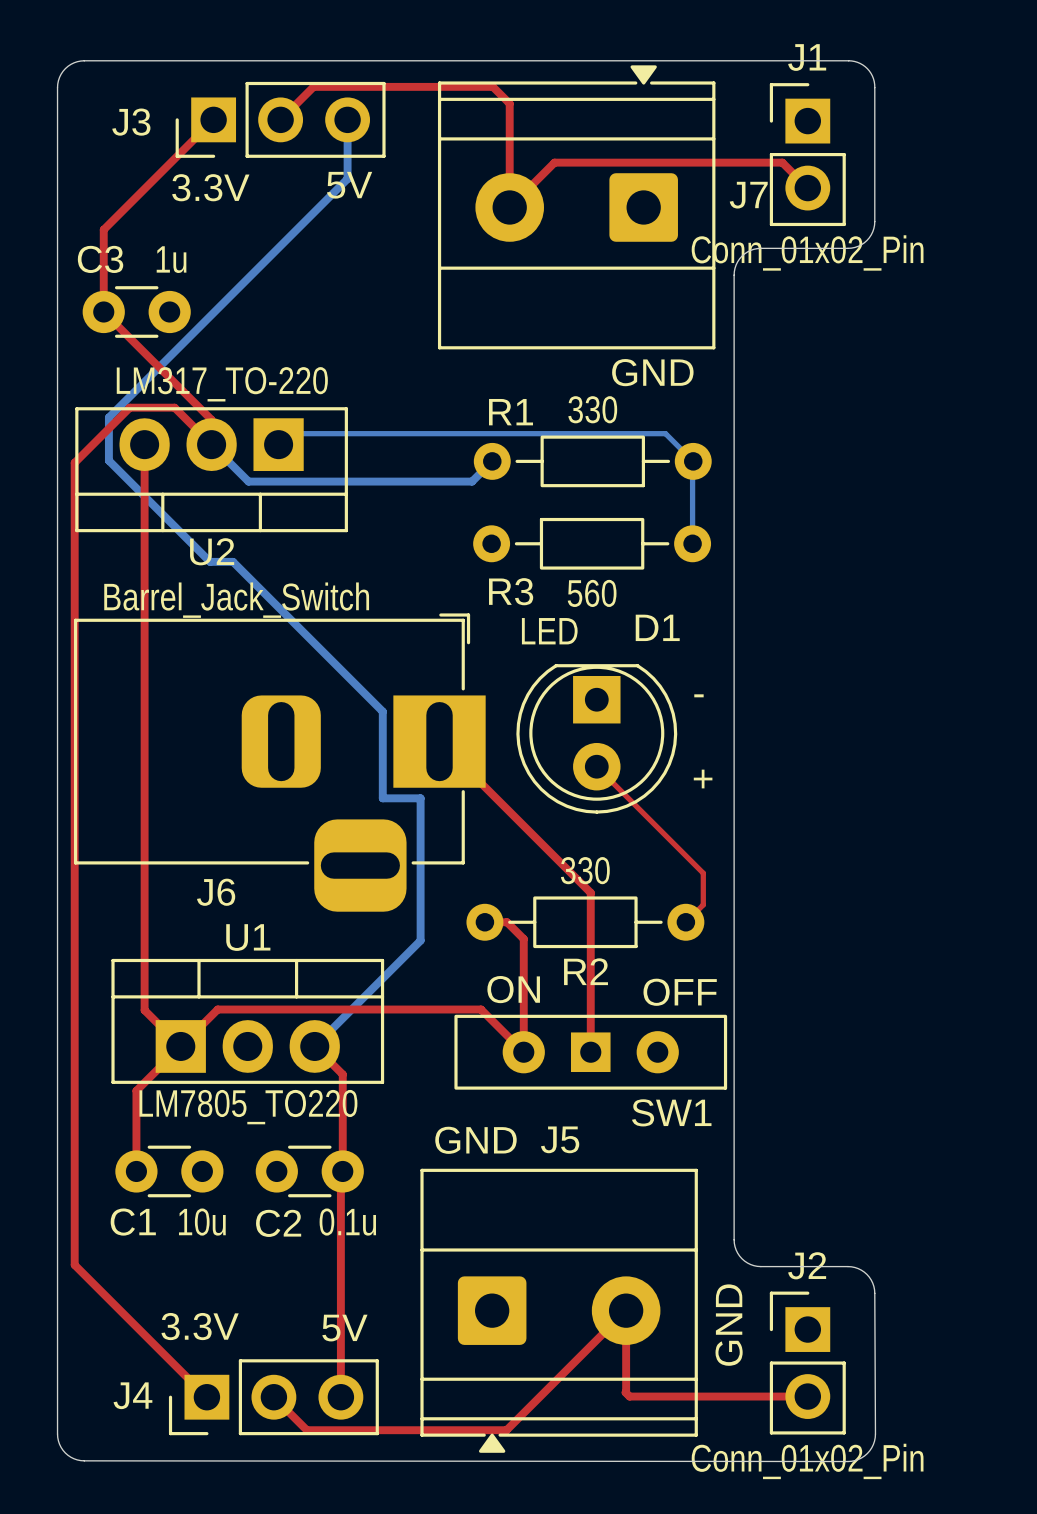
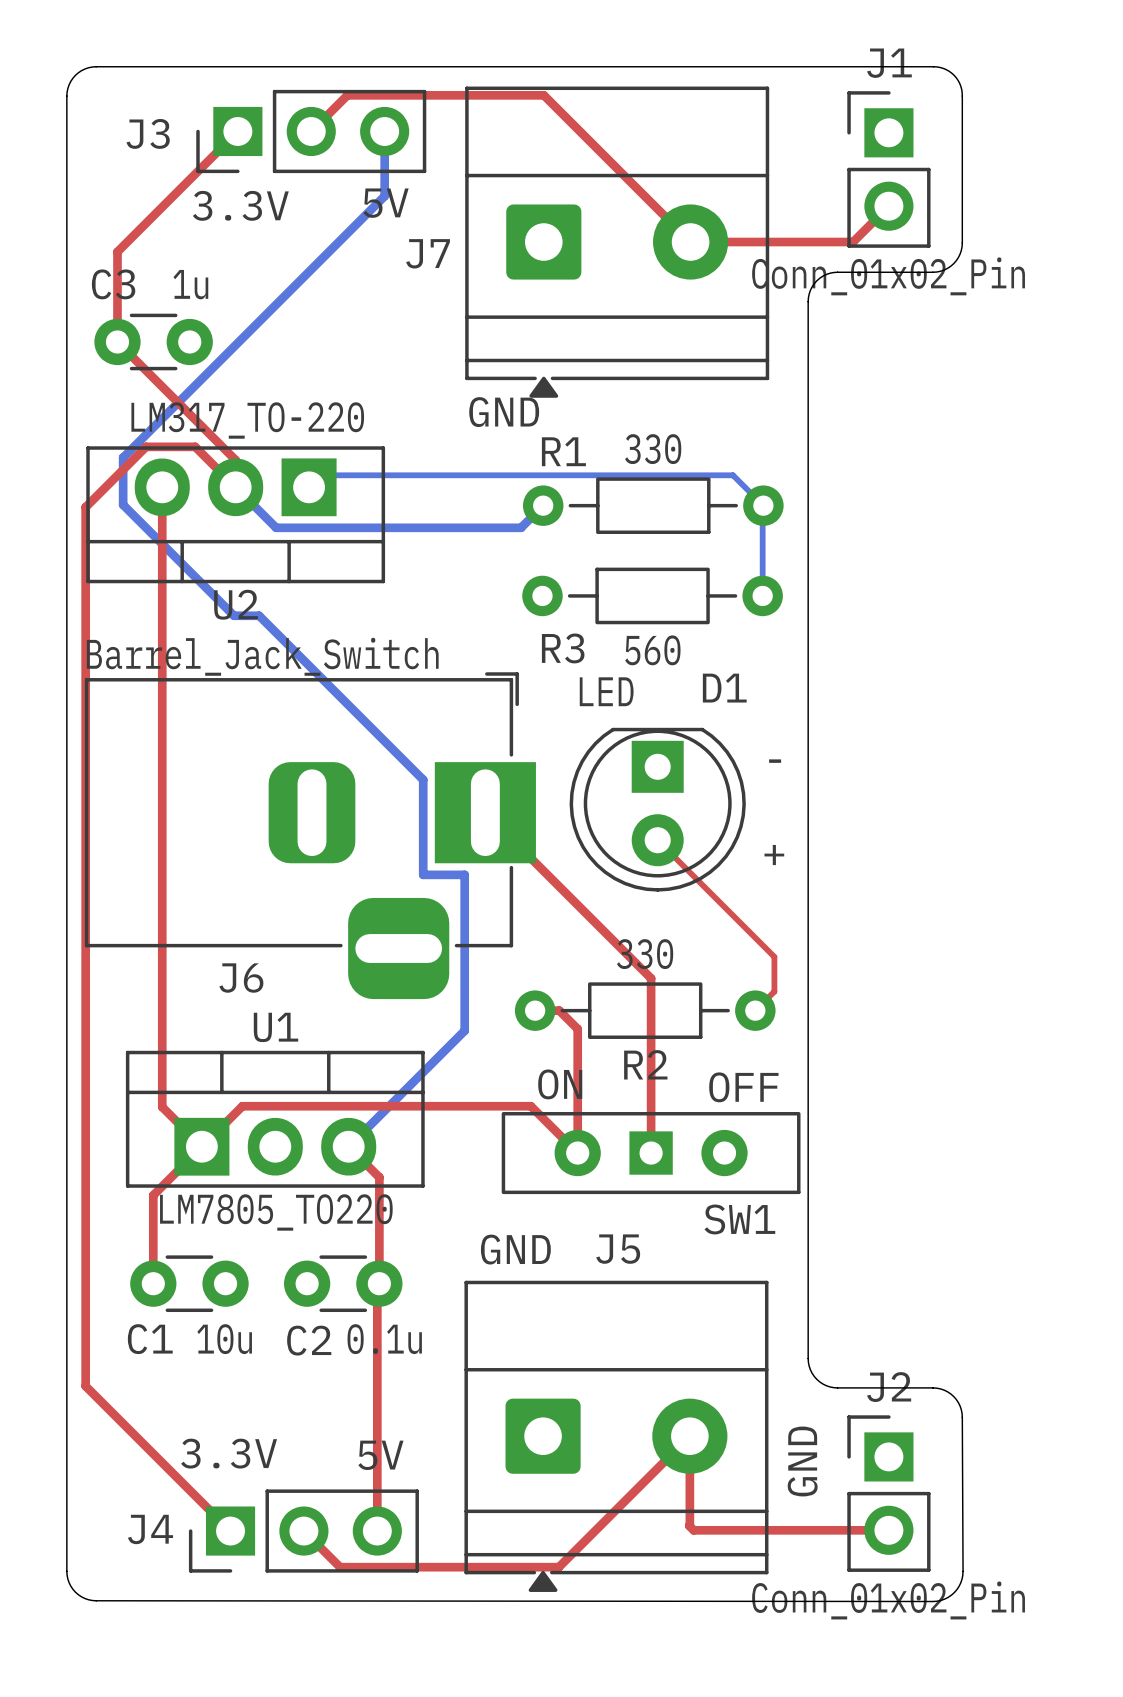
top track: (509, 103) (509, 207) (554, 162) (782, 162) (807, 188) -> (562, 113) (690, 242) (853, 242) (888, 206)
J7 rotation: 0° (576, 207) -> 180° (617, 242)
text position: GND (652, 372) -> GND (504, 412)

